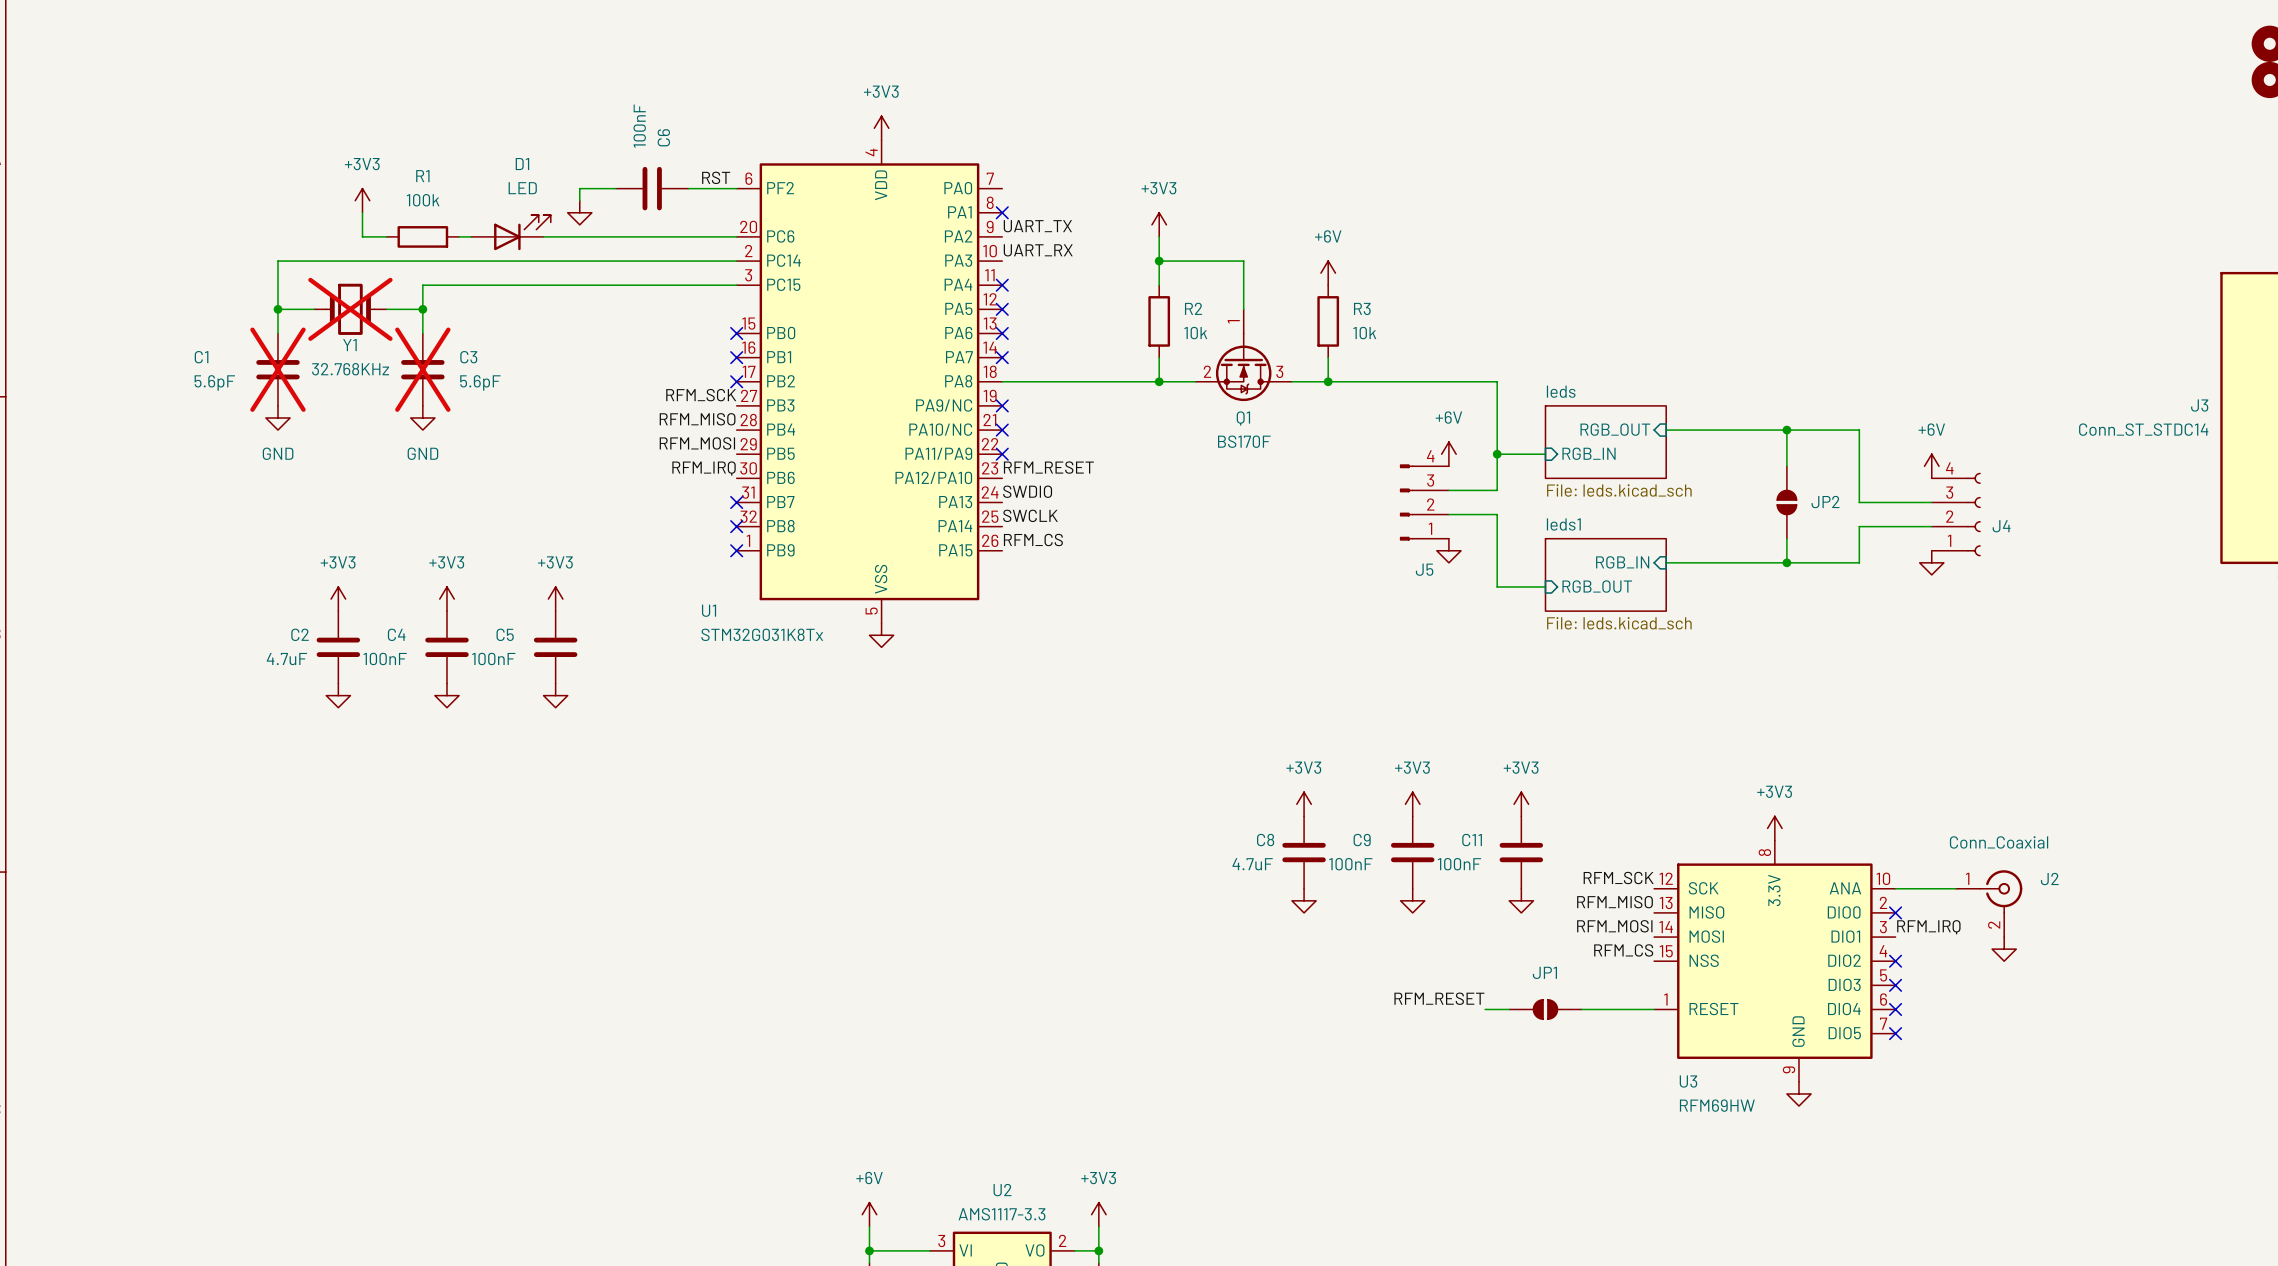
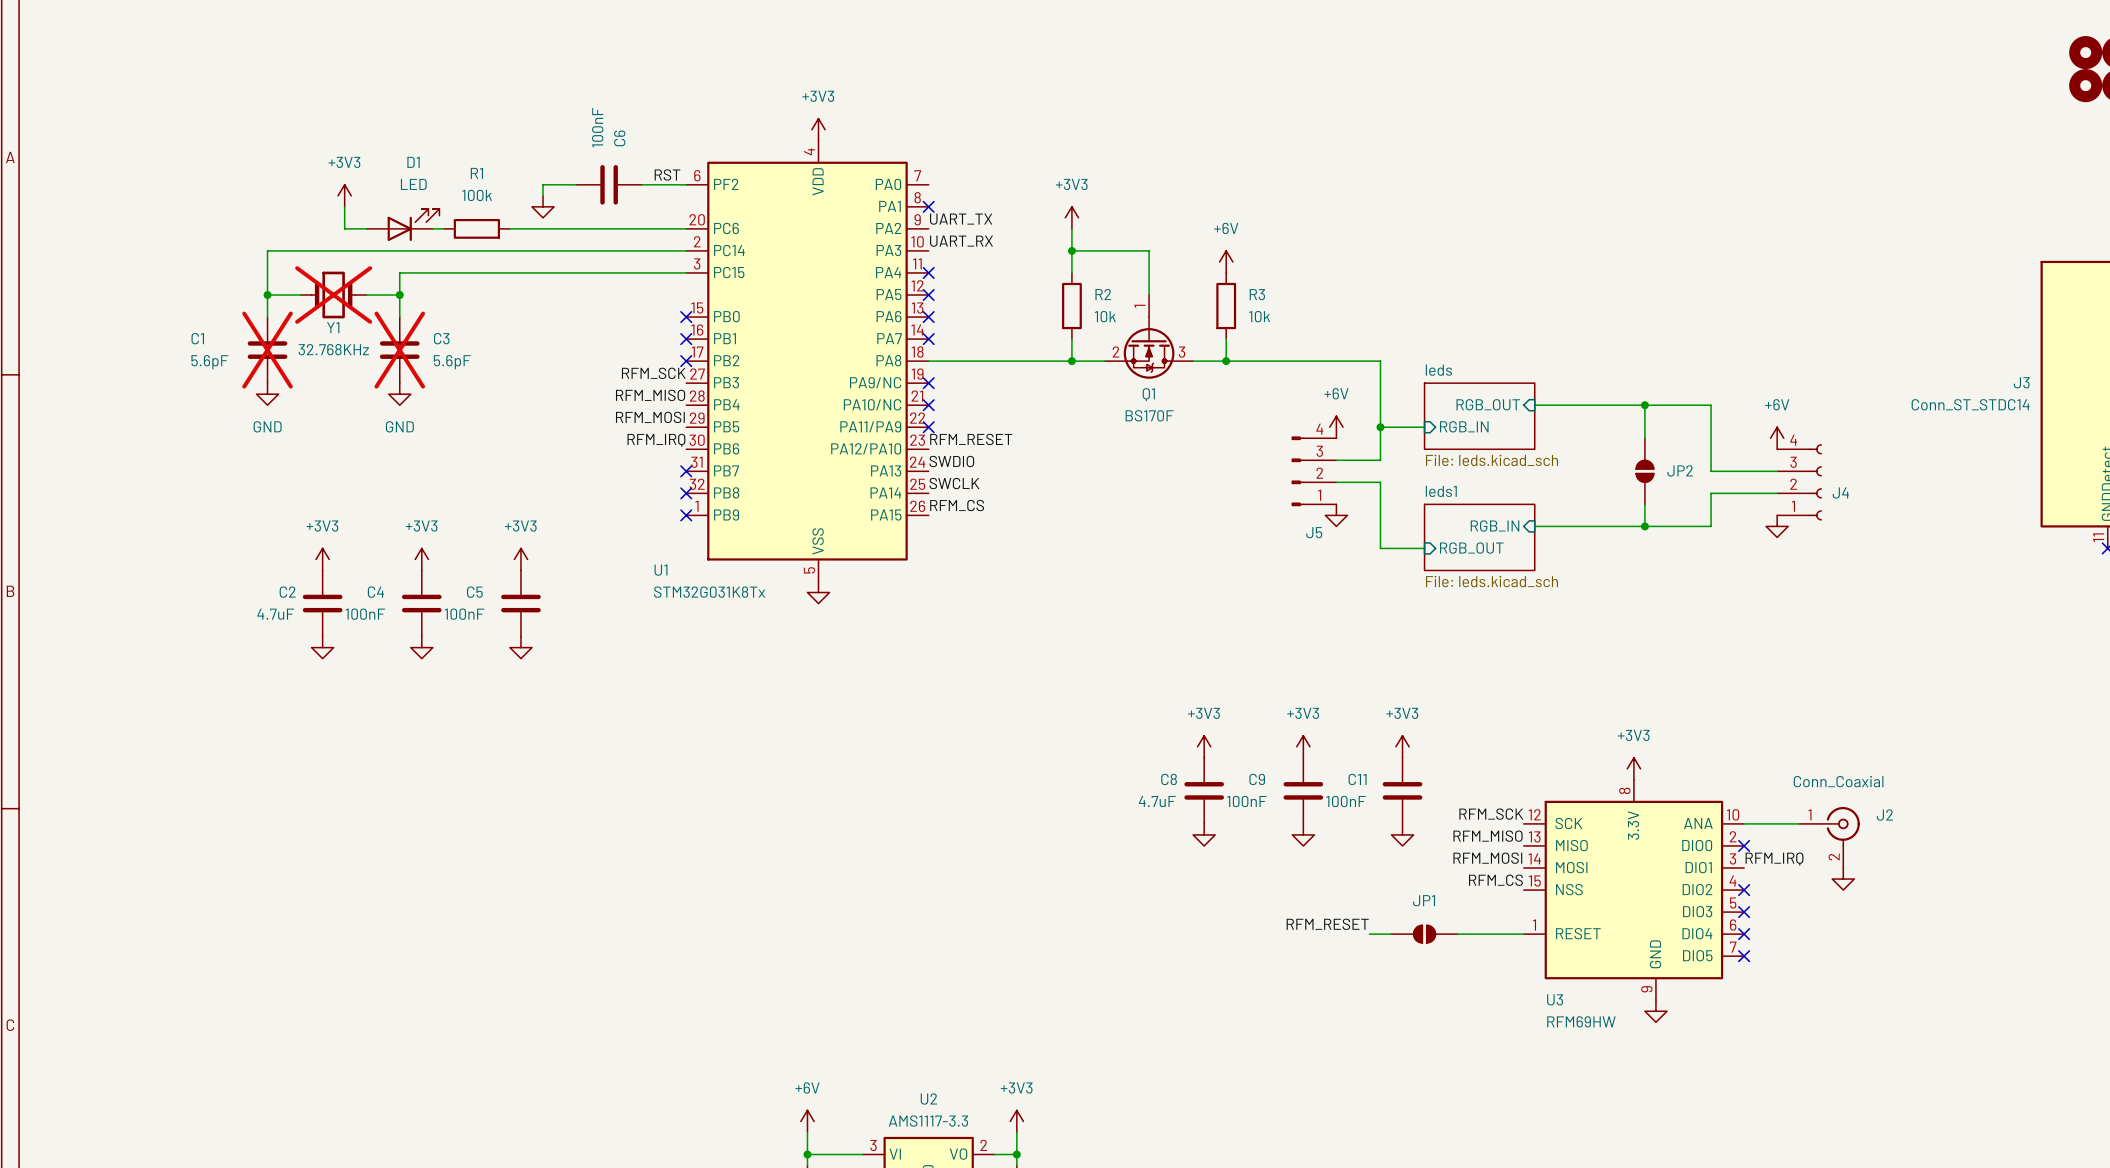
D1 position: (510, 232) -> (403, 225)
R1 position: (422, 236) -> (476, 228)

